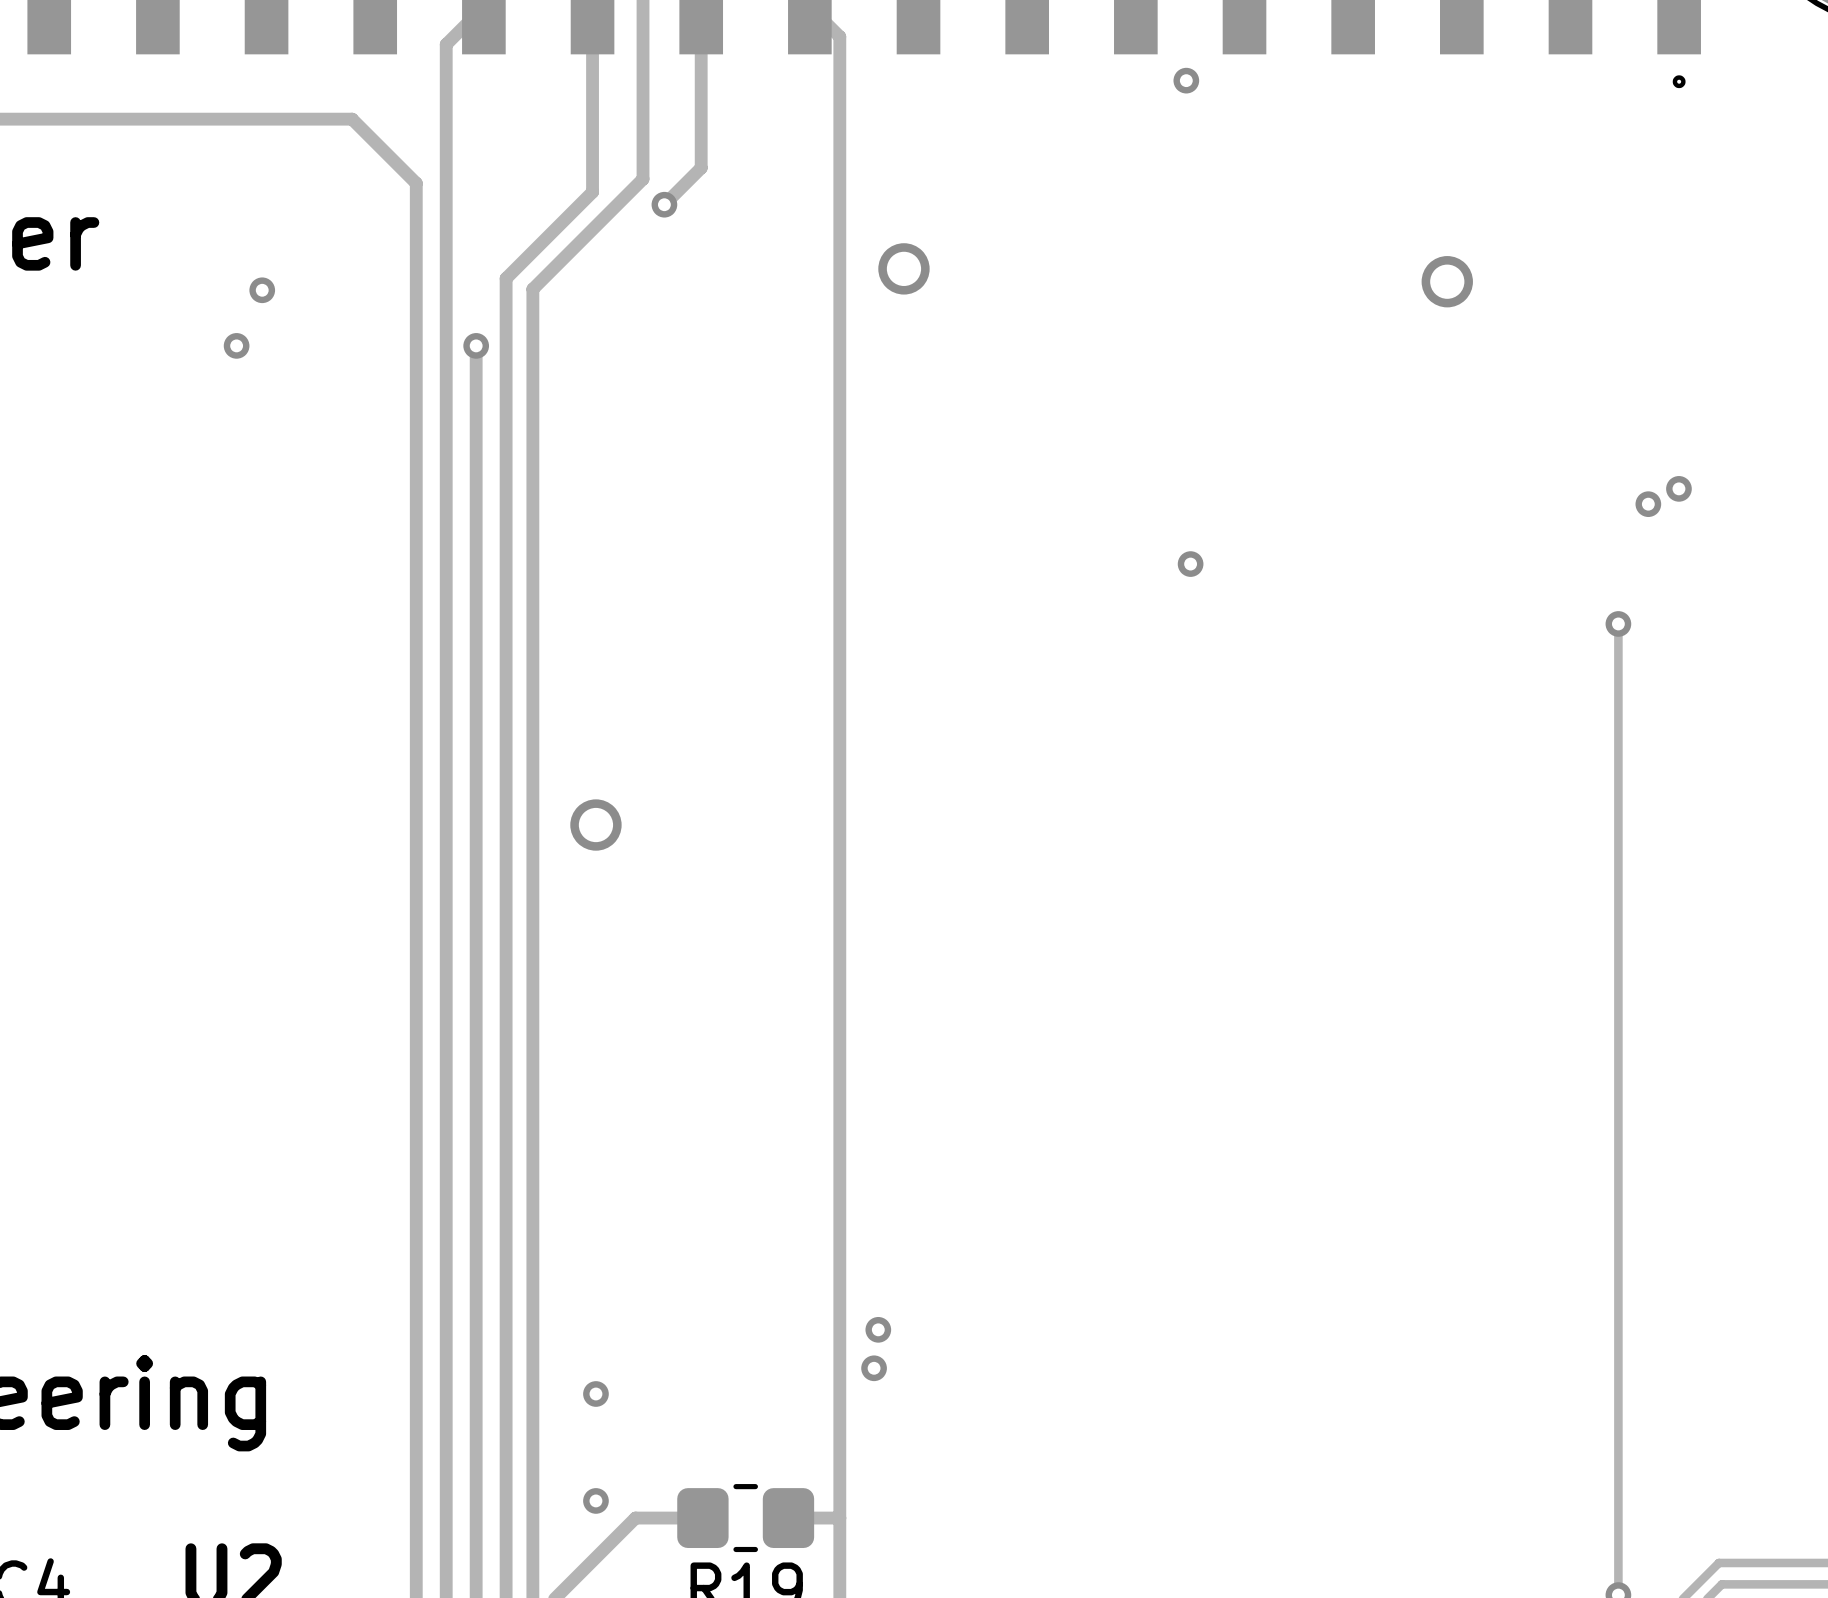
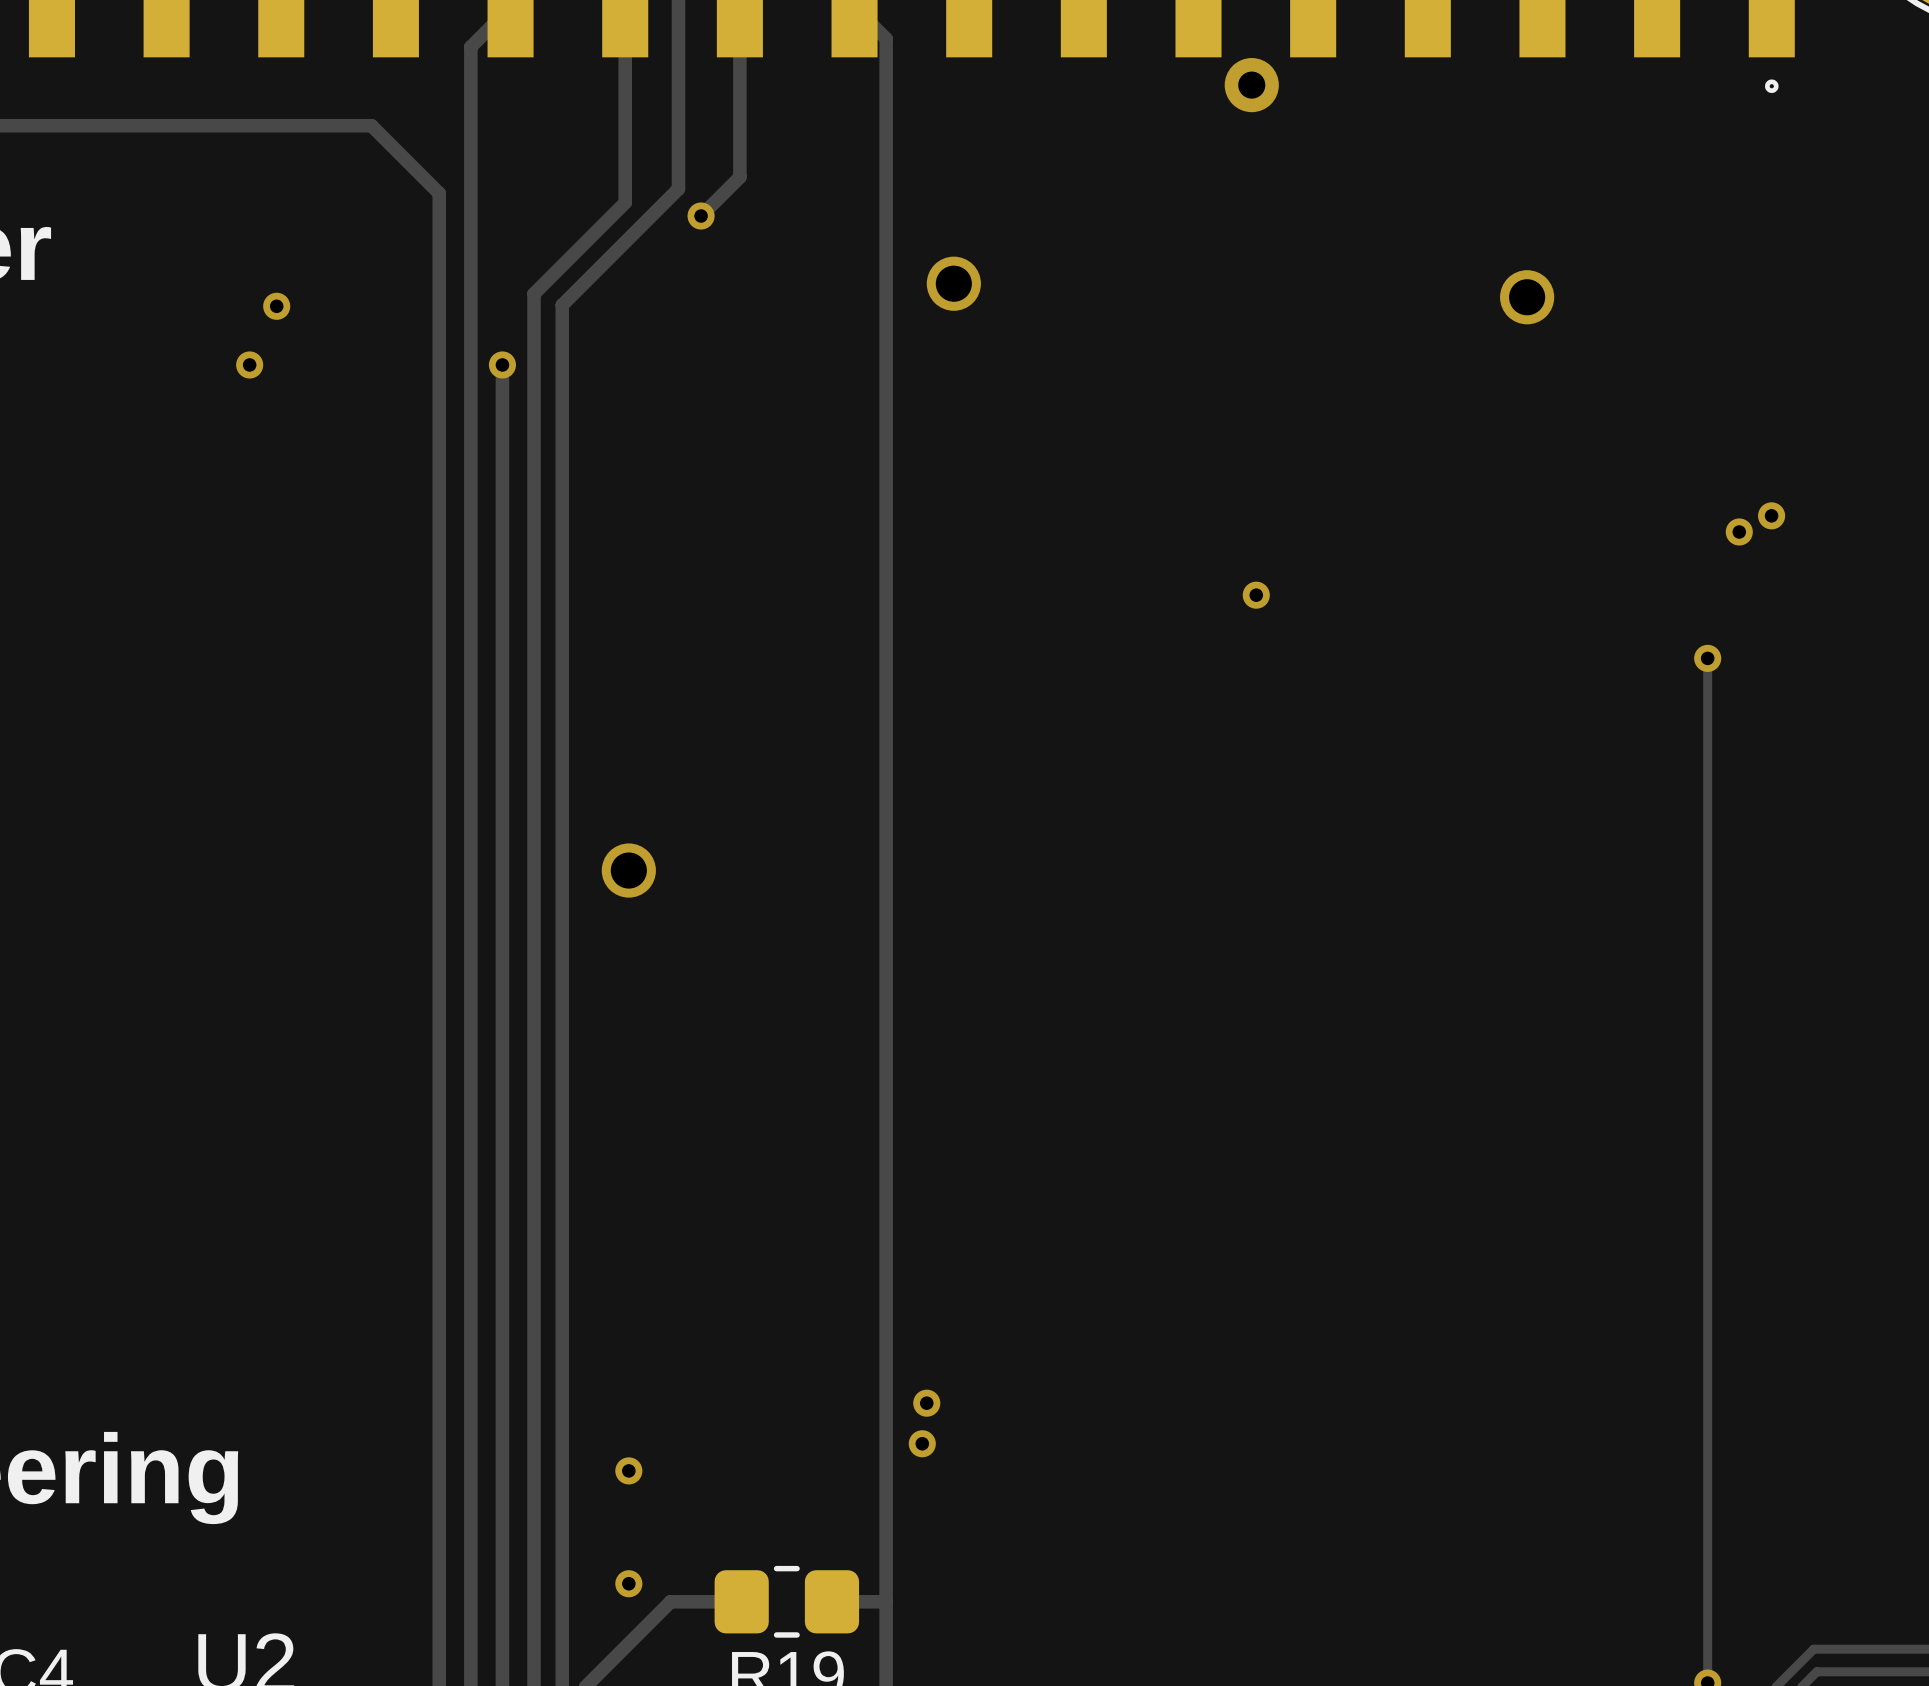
via size: [1173, 67, 1200, 94] -> [1224, 58, 1279, 113]

